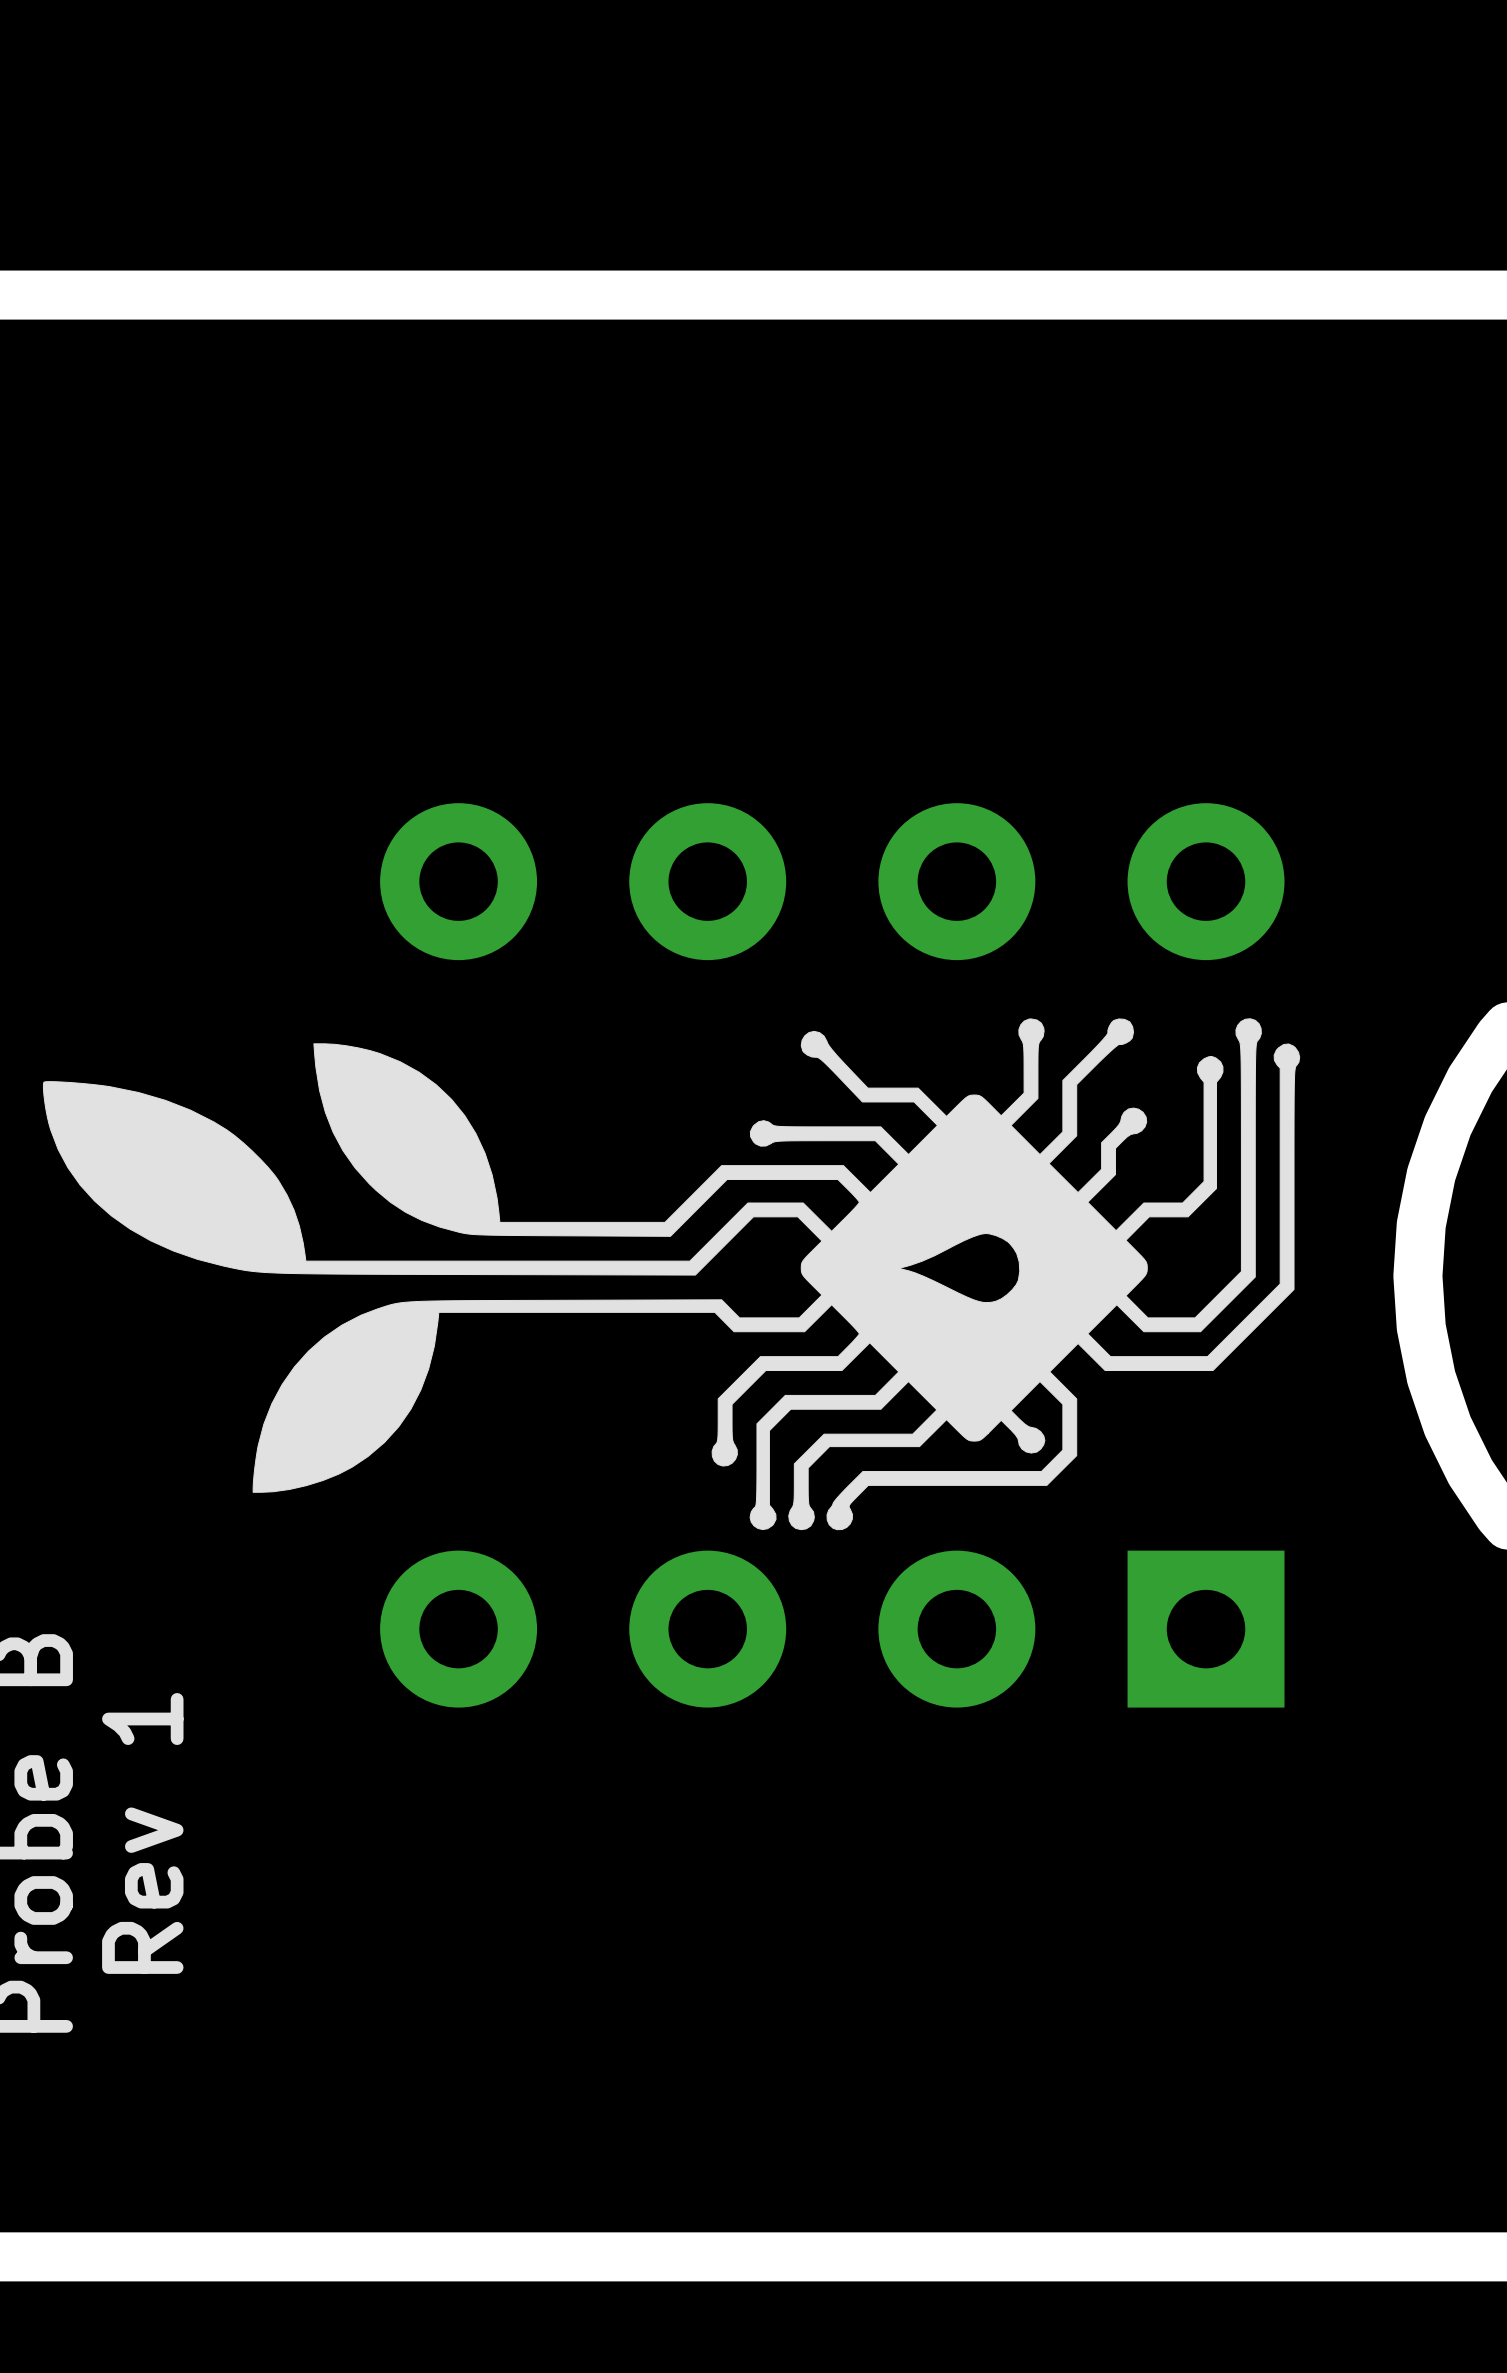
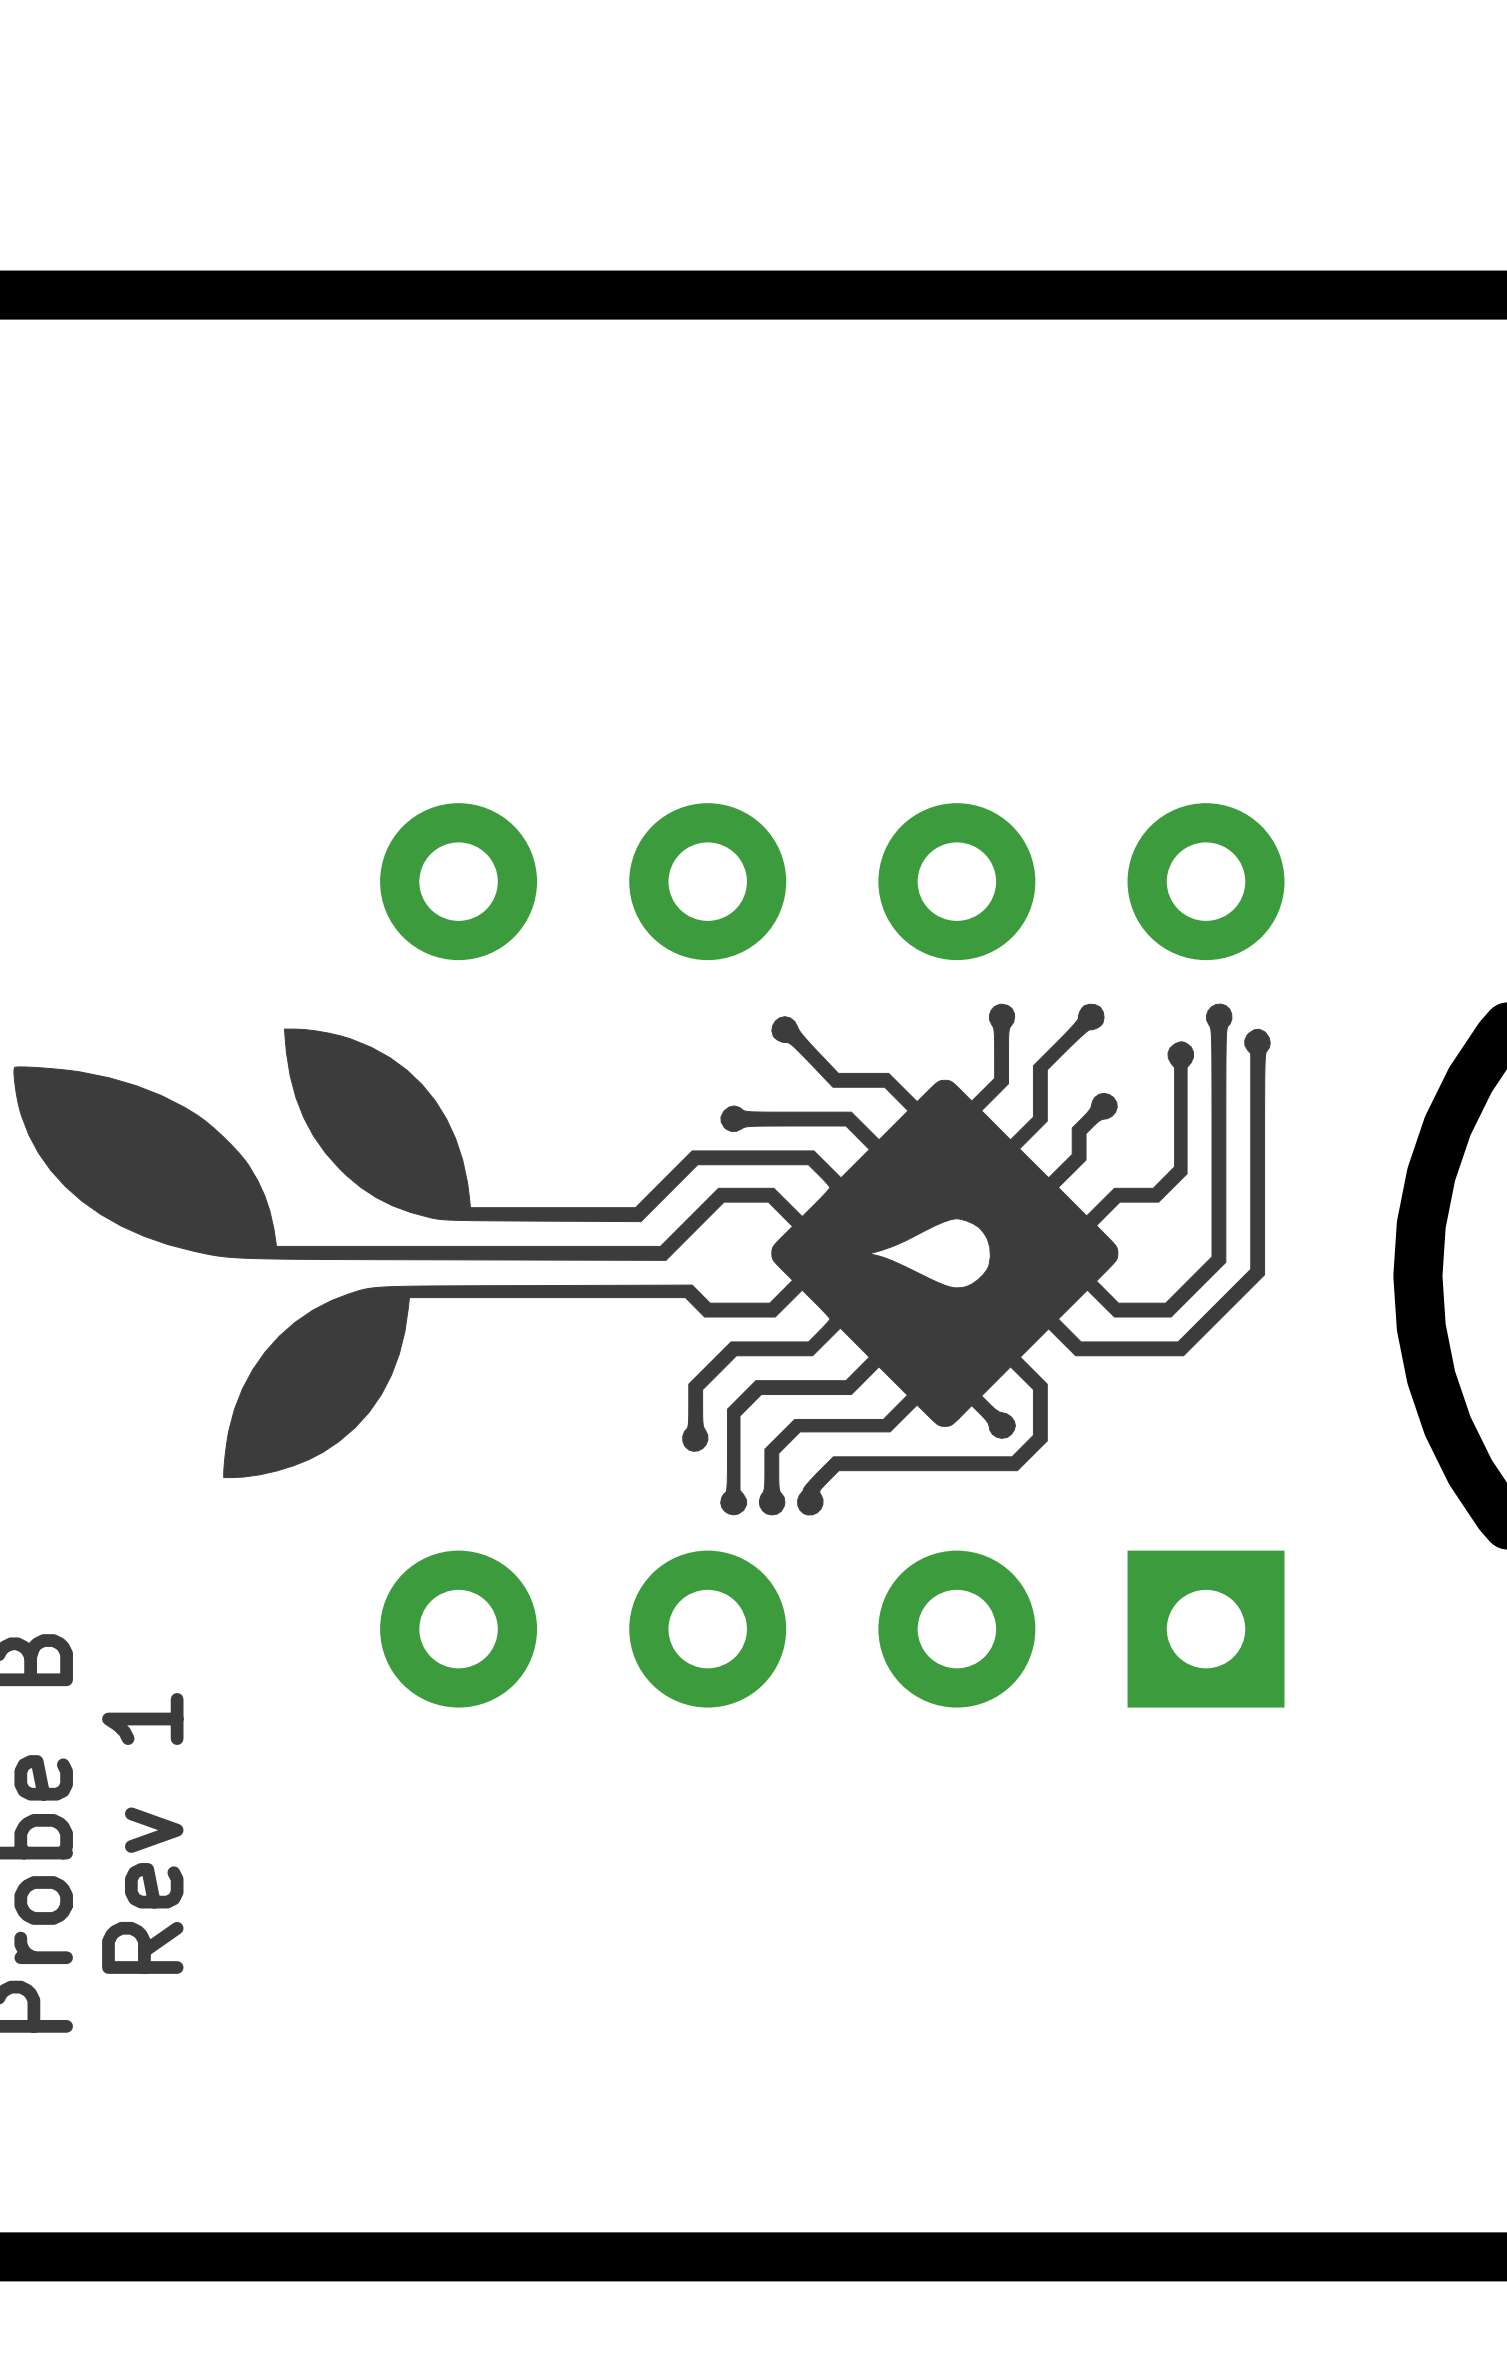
drawing position: (671, 1274) -> (642, 1259)

